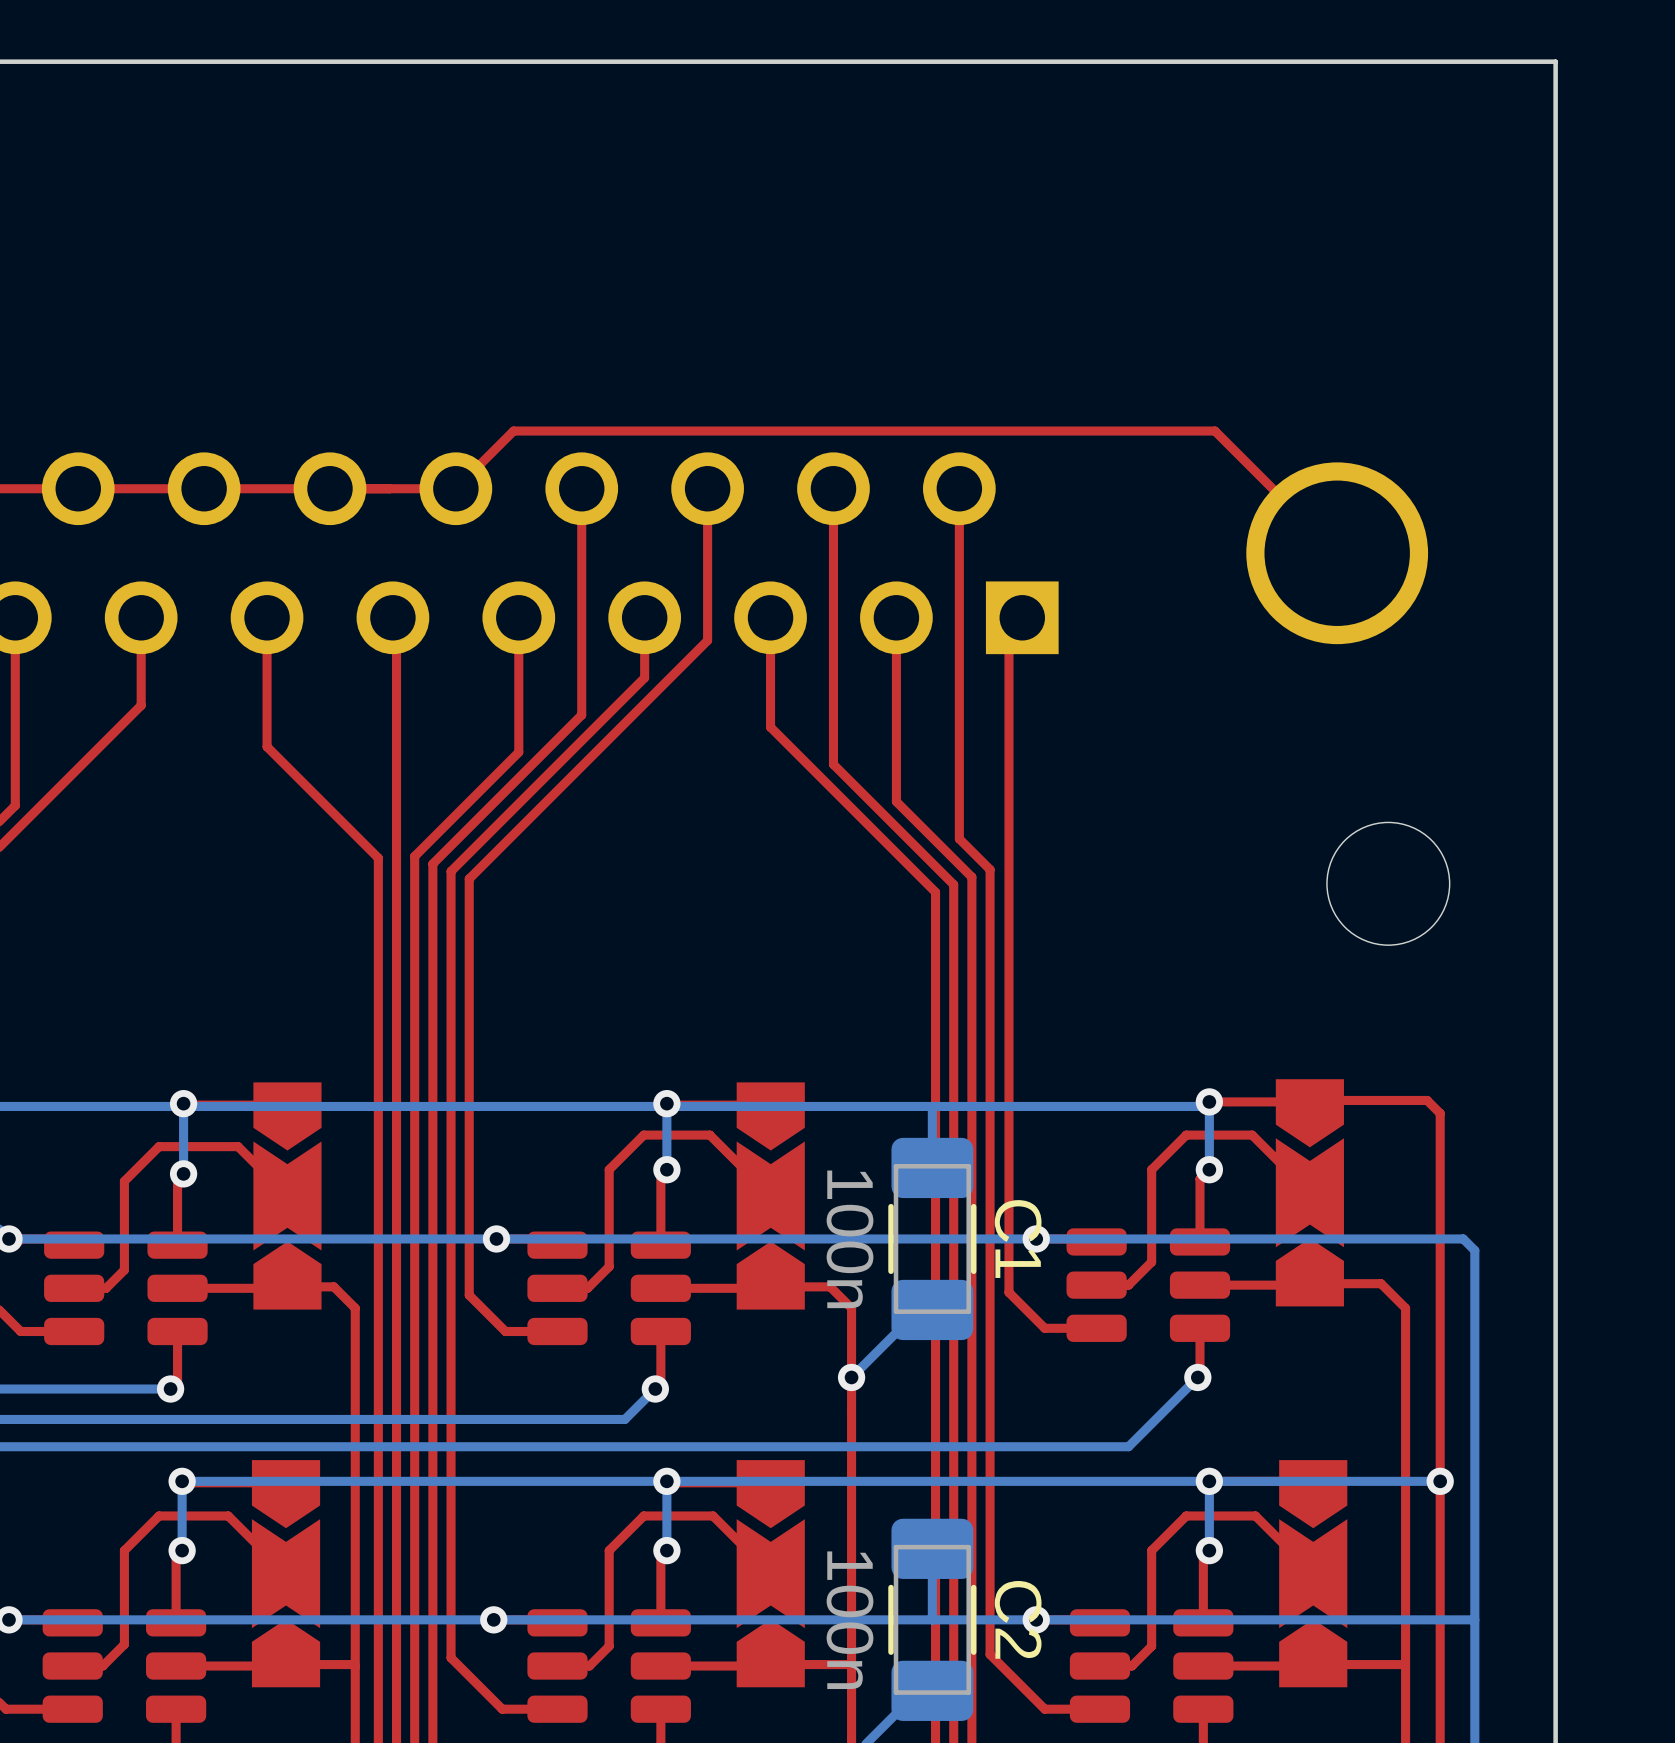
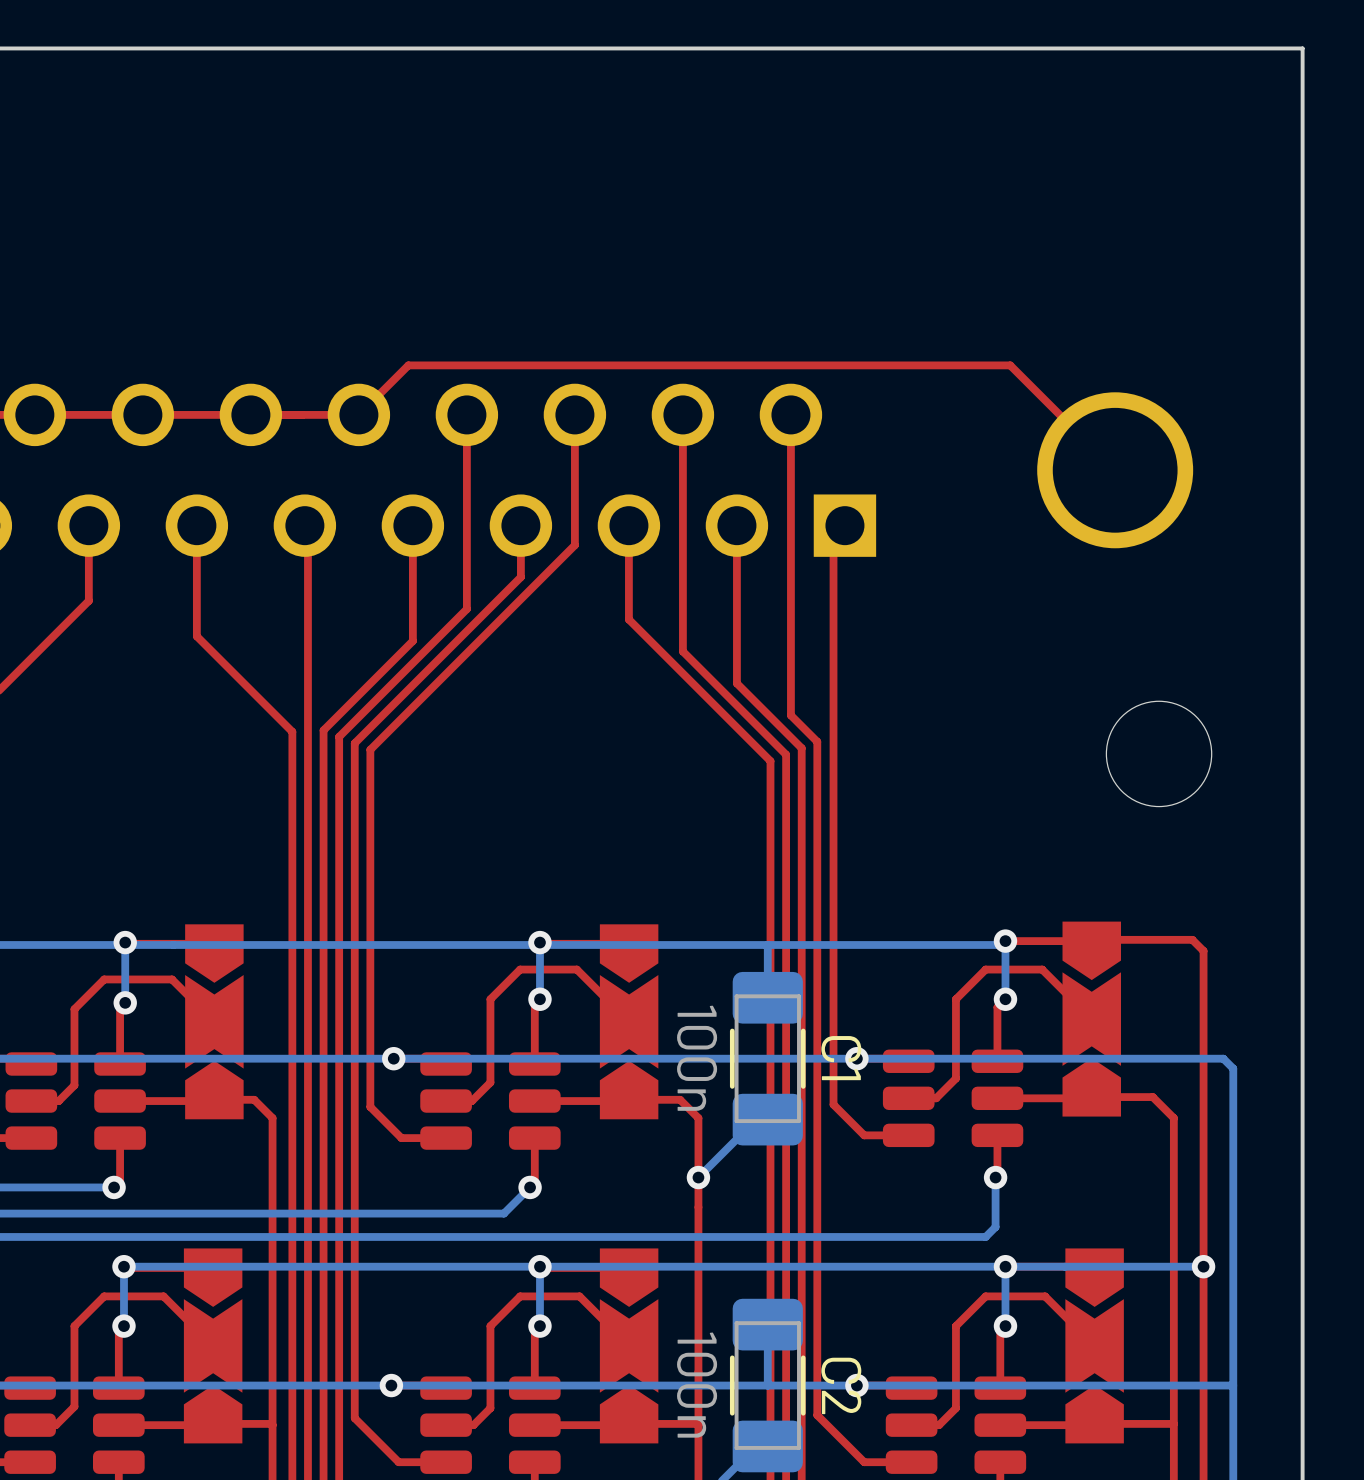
bottom track: (1197, 1377) (1128, 1446) -> (995, 1177) (995, 1227) (985, 1236) (936, 1236)

